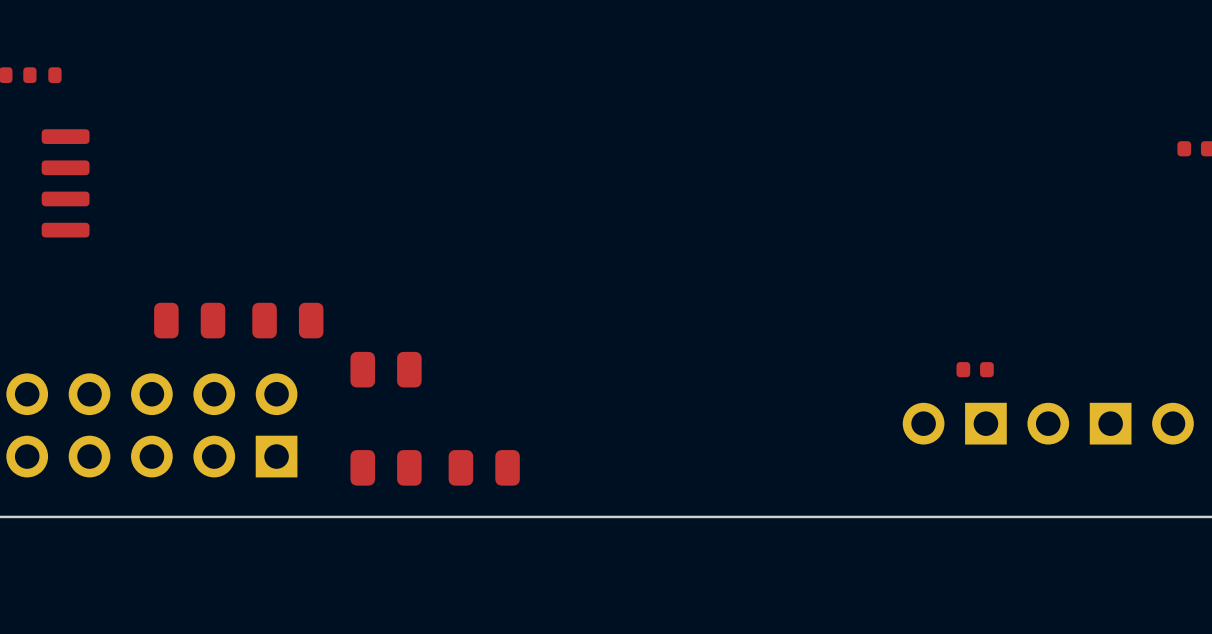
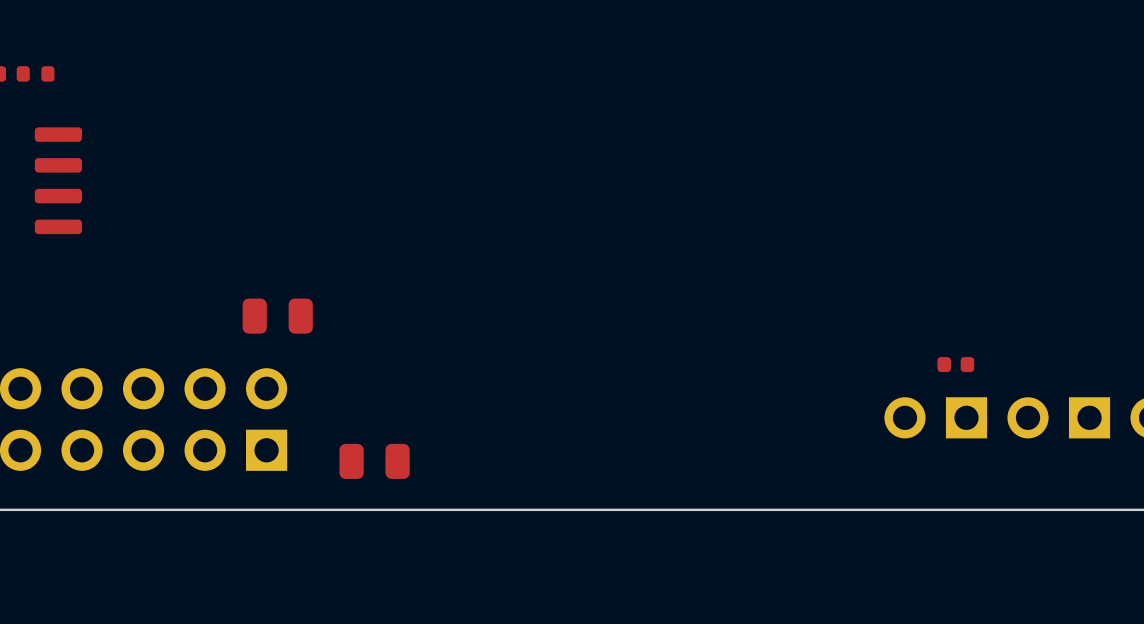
part: (189, 320) -> none
part: (386, 369) -> none
part: (484, 467) -> none

